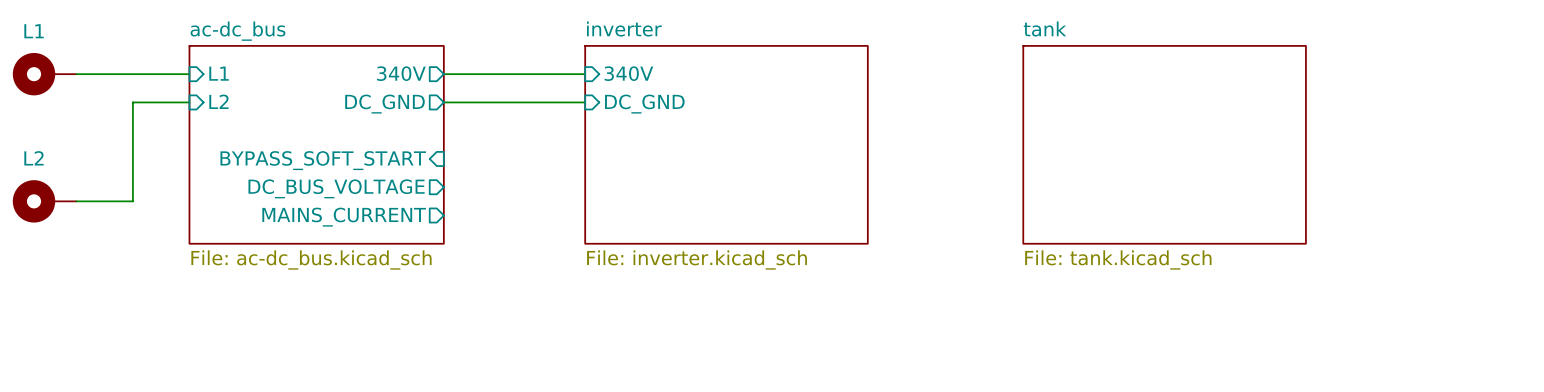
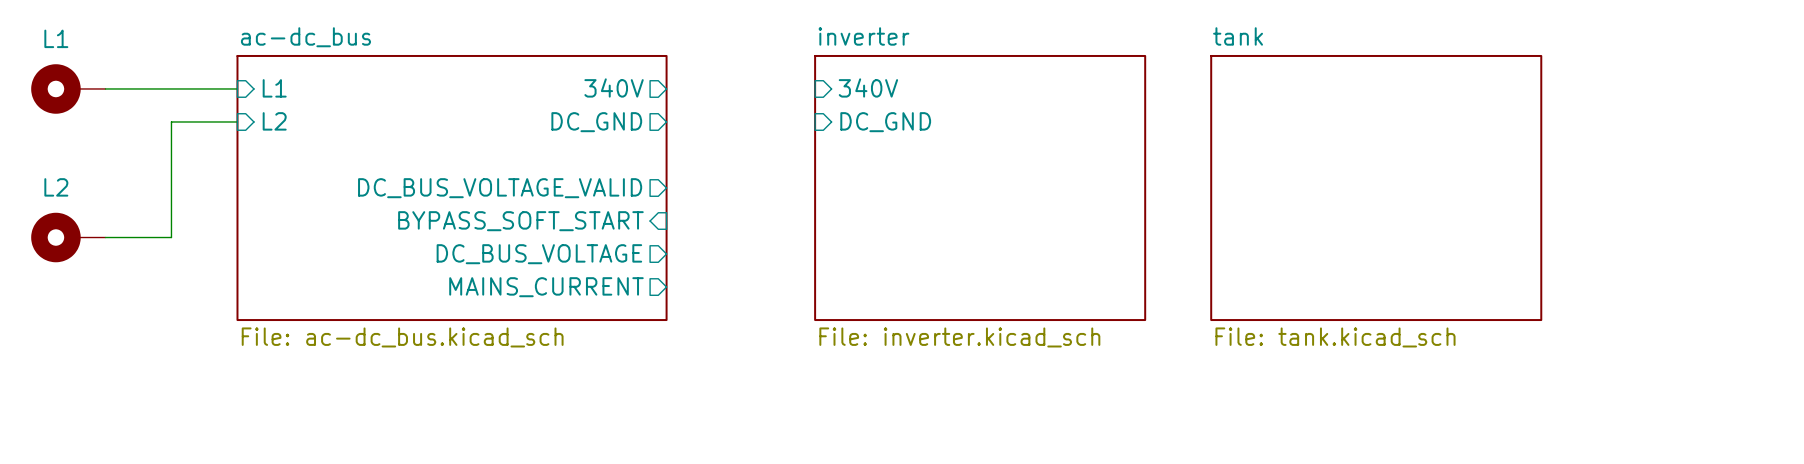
sheet pin: 340V (401, 73) -> none
sheet pin: none -> 340V (614, 87)
sheet pin: 340V (628, 73) -> none
sheet pin: none -> 340V (868, 87)
wire: (443, 74) (585, 74) -> none
wire: (443, 102) (585, 102) -> none
sheet pin: DC_GND (384, 104) -> none
sheet pin: none -> DC_GND (596, 122)
sheet pin: DC_GND (644, 104) -> none
sheet pin: none -> DC_GND (885, 122)
sheet ac-dc_bus: File: ac-dc_bus.kicad_sch (316, 144) -> none
sheet inverter: File: inverter.kicad_sch (726, 144) -> none
sheet tank: File: tank.kicad_sch (1164, 144) -> none
sheet ac-dc_bus: none -> File: ac-dc_bus.kicad_sch (452, 188)
sheet inverter: none -> File: inverter.kicad_sch (980, 188)
sheet tank: none -> File: tank.kicad_sch (1376, 188)
sheet pin position: BYPASS_SOFT_START (323, 160) -> BYPASS_SOFT_START (520, 221)
sheet pin: none -> DC_BUS_VOLTAGE_VALID (500, 188)
sheet pin position: DC_BUS_VOLTAGE (336, 188) -> DC_BUS_VOLTAGE (539, 254)
sheet pin position: MAINS_CURRENT (344, 217) -> MAINS_CURRENT (546, 287)

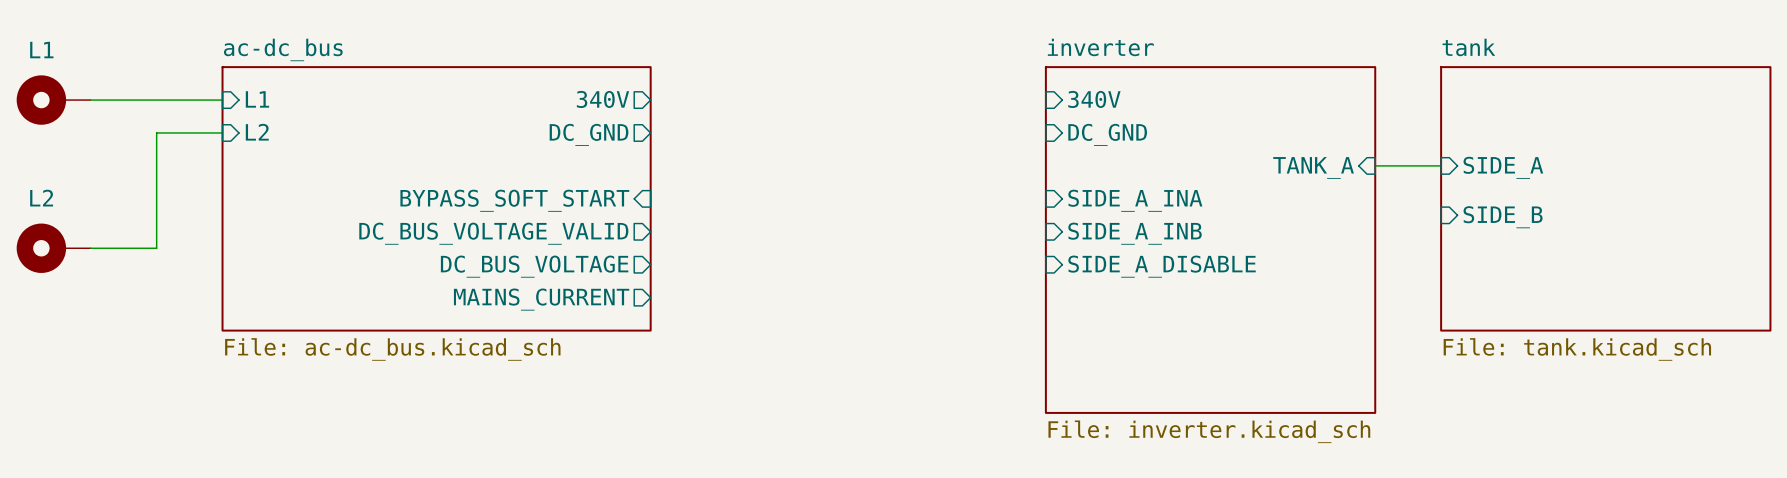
sheet pin position: 340V (868, 87) -> 340V (1094, 99)
sheet pin position: DC_GND (885, 122) -> DC_GND (1107, 134)
sheet pin: none -> TANK_A (1313, 167)
wire: none -> (1375, 165) (1441, 165)
sheet pin: none -> SIDE_A (1503, 167)
sheet pin shape: output (500, 188) -> input (514, 200)
sheet pin: DC_BUS_VOLTAGE_VALID (500, 188) -> BYPASS_SOFT_START (514, 200)
sheet inverter: File: inverter.kicad_sch (980, 188) -> none
sheet pin: none -> SIDE_A_INA (1135, 200)
sheet tank position: (1376, 188) -> (1605, 198)
sheet pin: none -> SIDE_B (1503, 217)
sheet pin shape: input (520, 221) -> output (493, 233)
sheet pin: BYPASS_SOFT_START (520, 221) -> DC_BUS_VOLTAGE_VALID (493, 233)
sheet pin: none -> SIDE_A_INB (1135, 233)
sheet inverter: none -> File: inverter.kicad_sch (1210, 240)
sheet pin: none -> SIDE_A_DISABLE (1162, 266)

